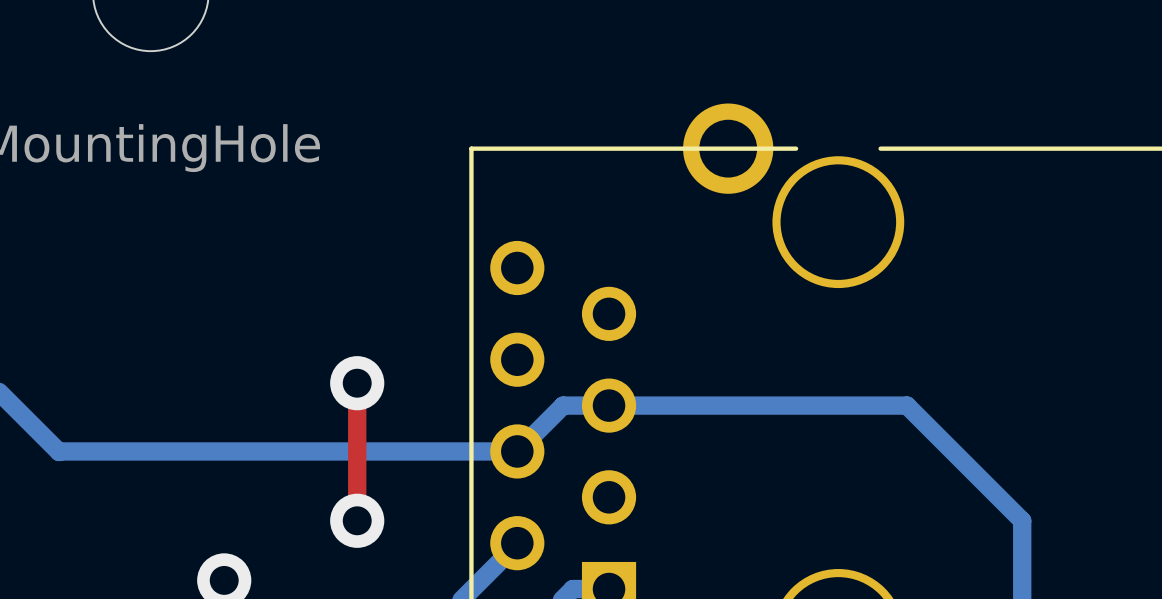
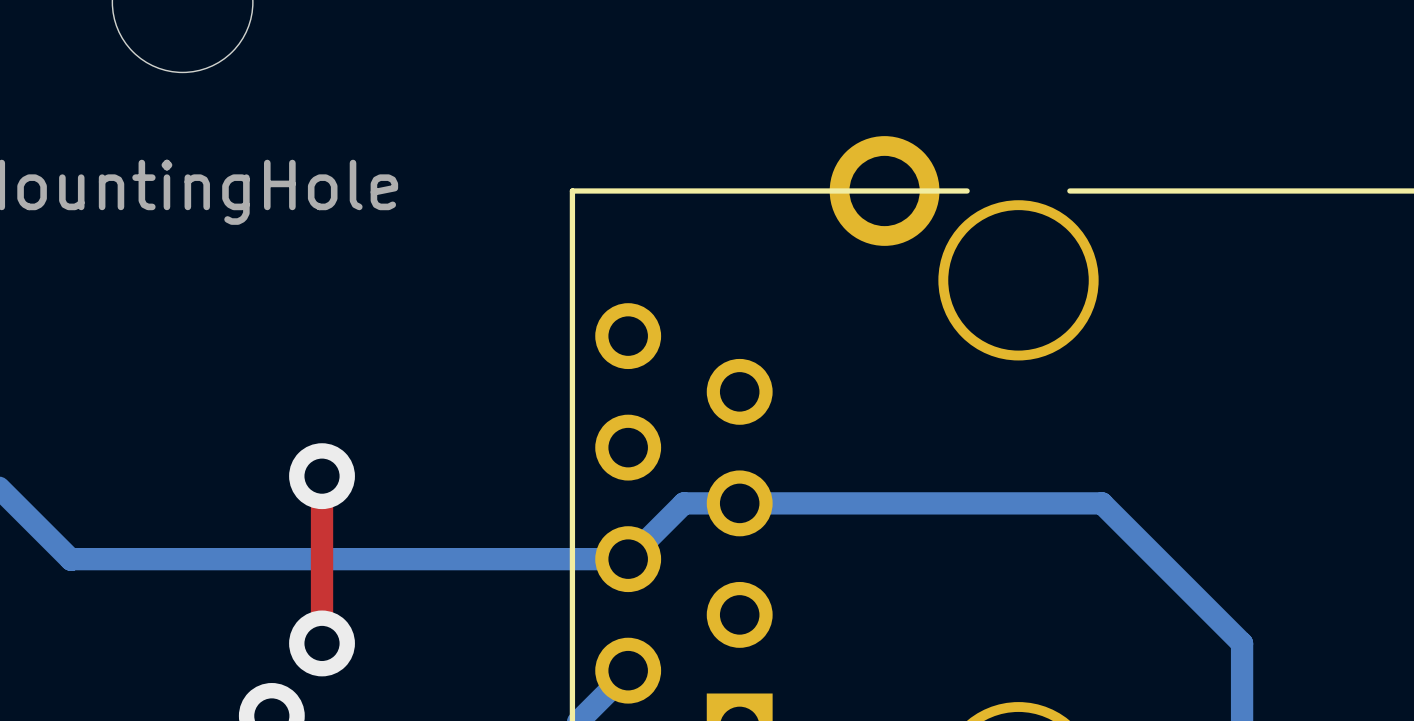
via: none -> (322, 476)
top track: (357, 383) (357, 520) -> (322, 476) (322, 643)
via: (357, 383) -> none
via: none -> (322, 643)
via: (357, 520) -> none

